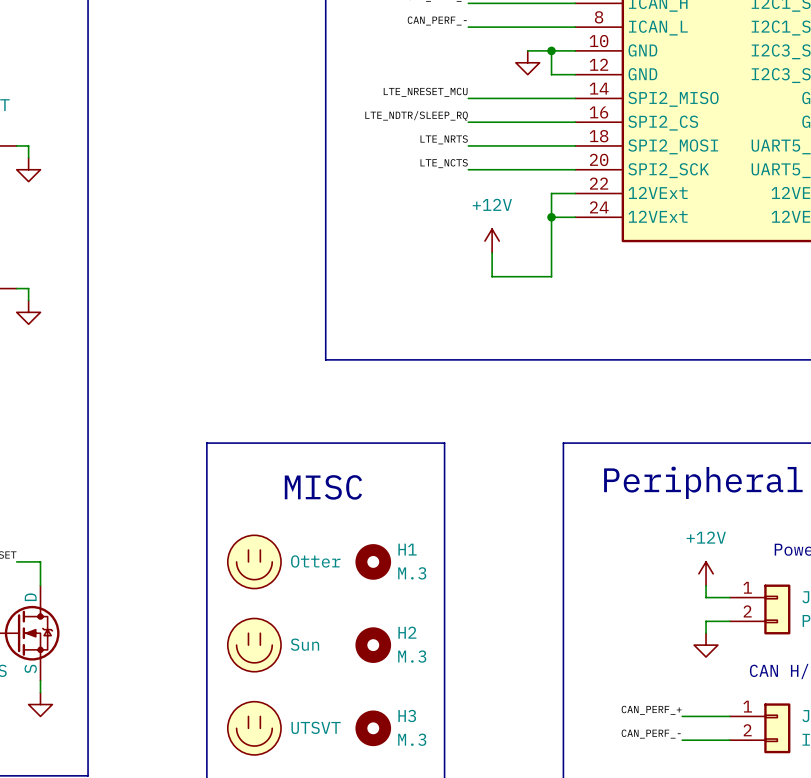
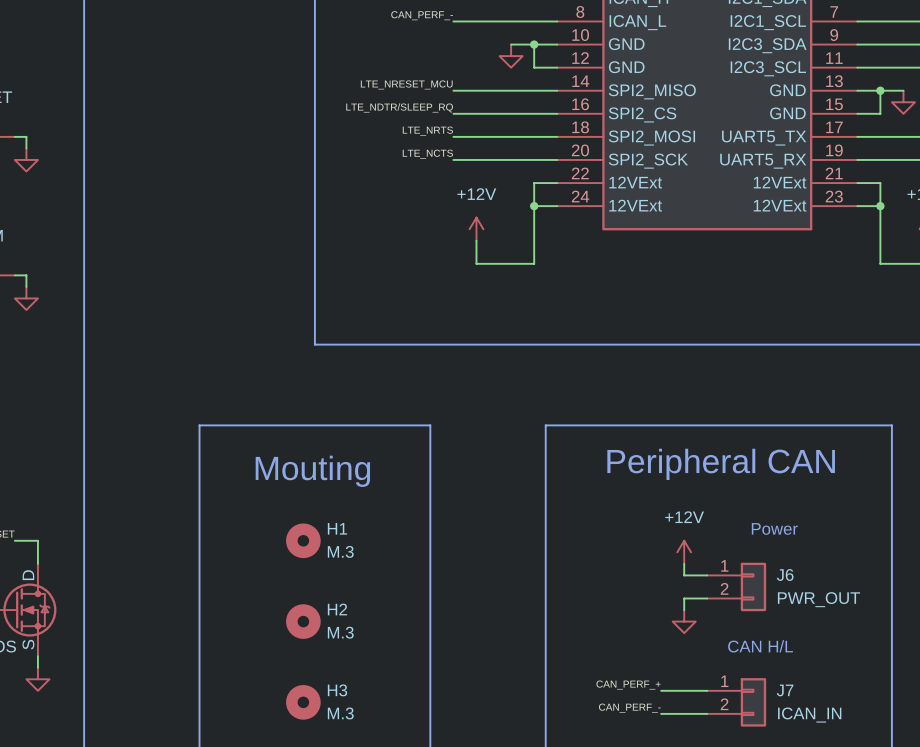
text: MISC (323, 487) -> Mouting (312, 471)
part: Otter (254, 561) -> none
H1 position: (373, 561) -> (303, 540)
part: Sun (254, 645) -> none
H2 position: (373, 645) -> (303, 621)
part: UTSVT (254, 728) -> none
H3 position: (373, 728) -> (303, 702)

